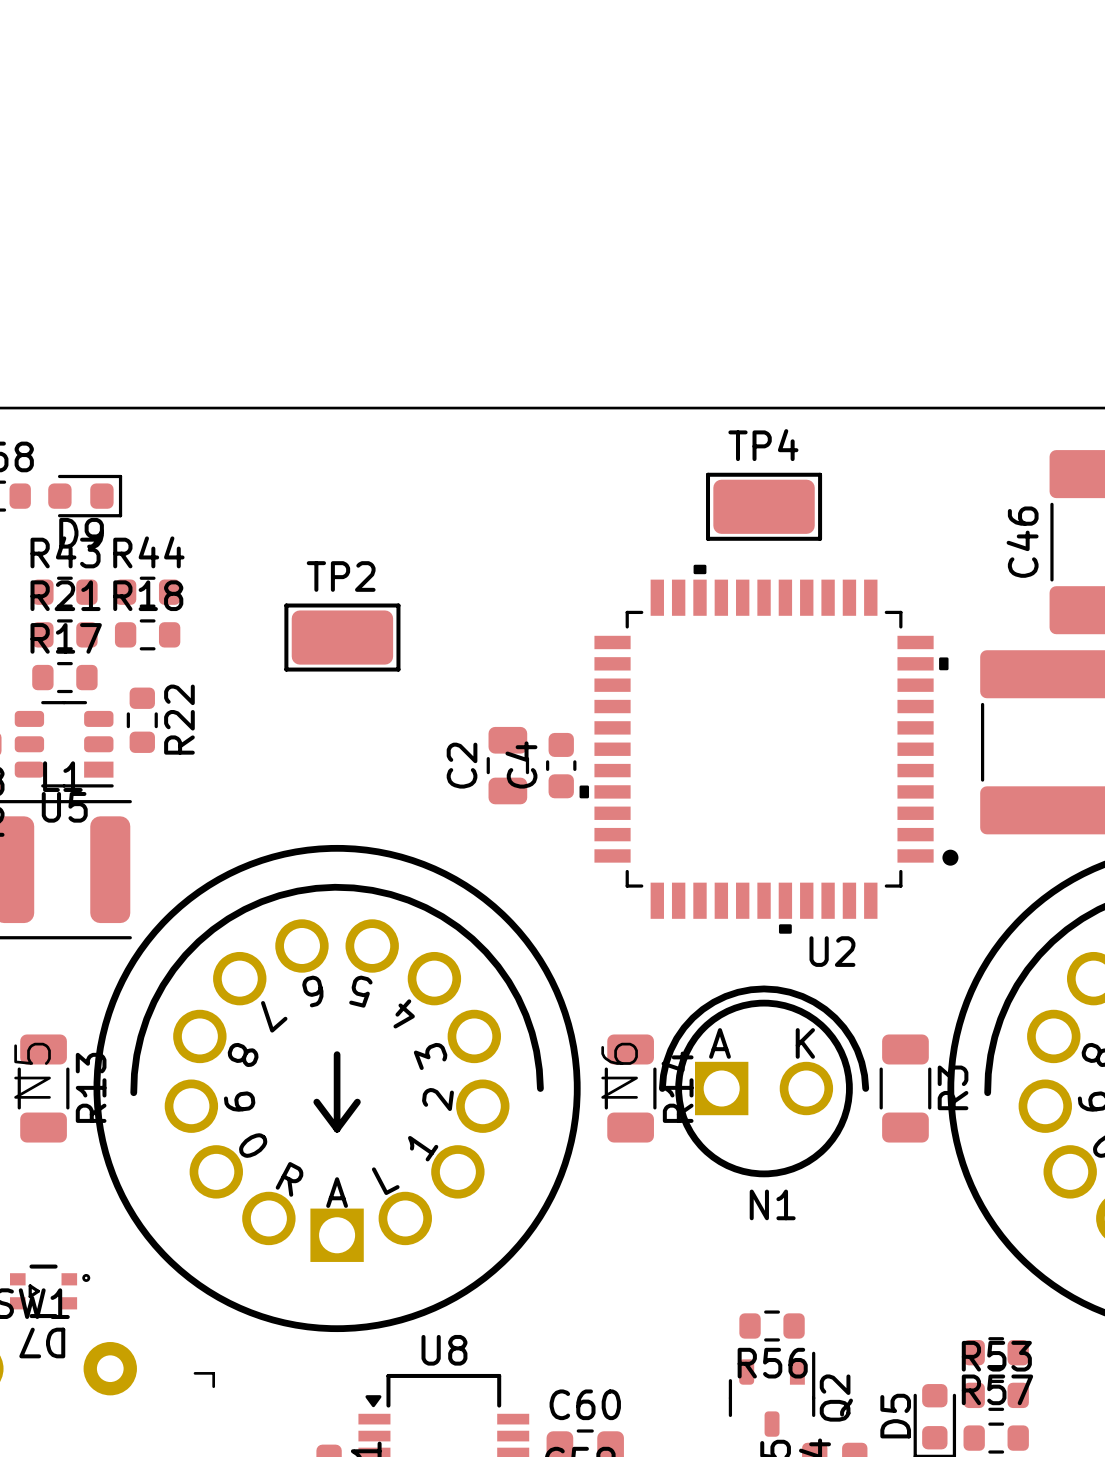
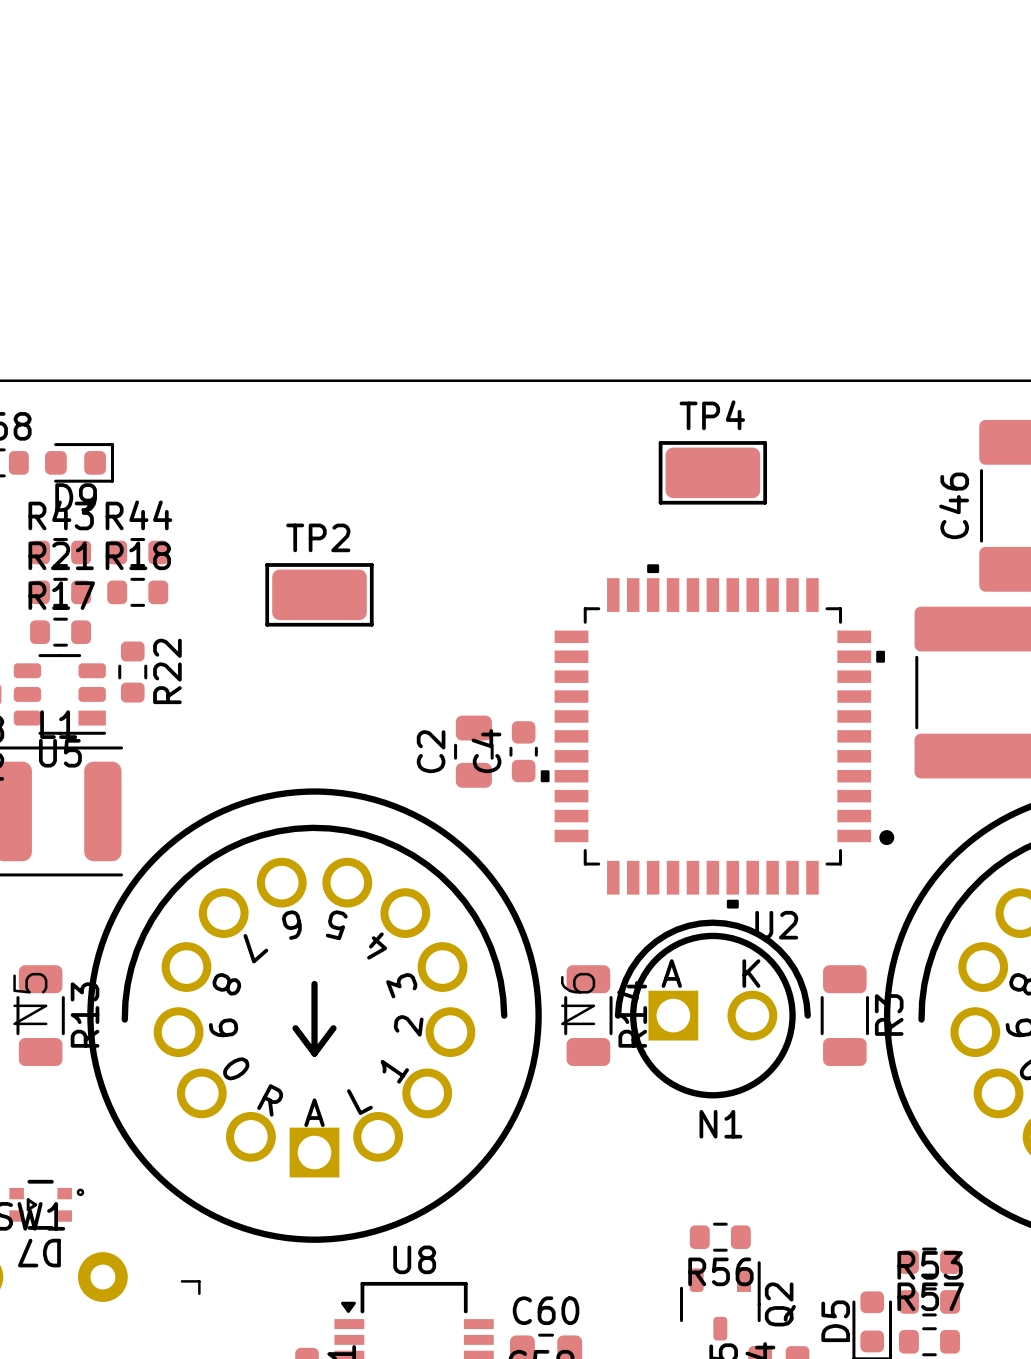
U2 position: (769, 749) -> (717, 736)
C2 position: (507, 765) -> (473, 751)
C4 position: (561, 765) -> (523, 751)

